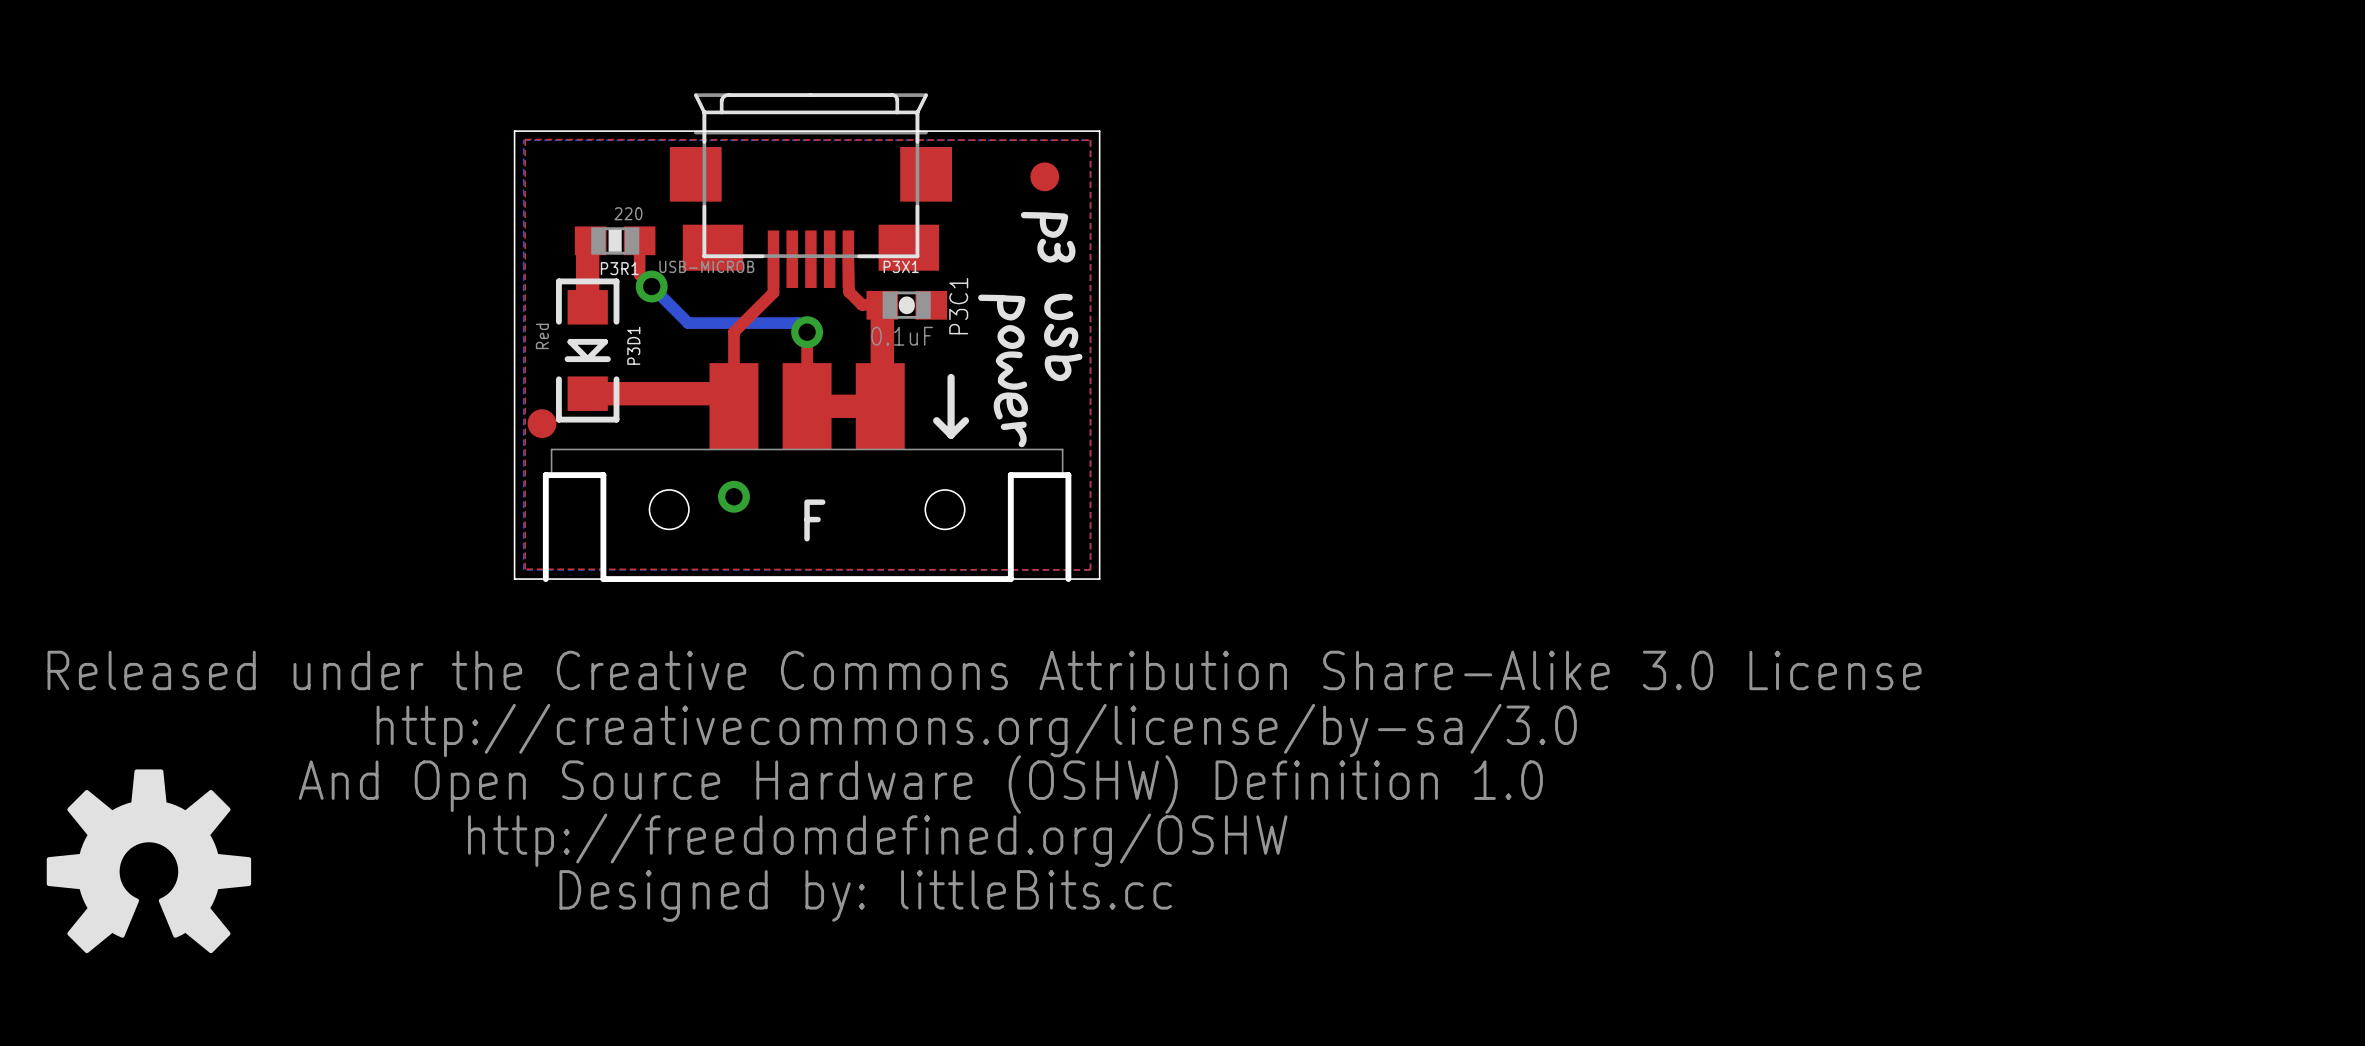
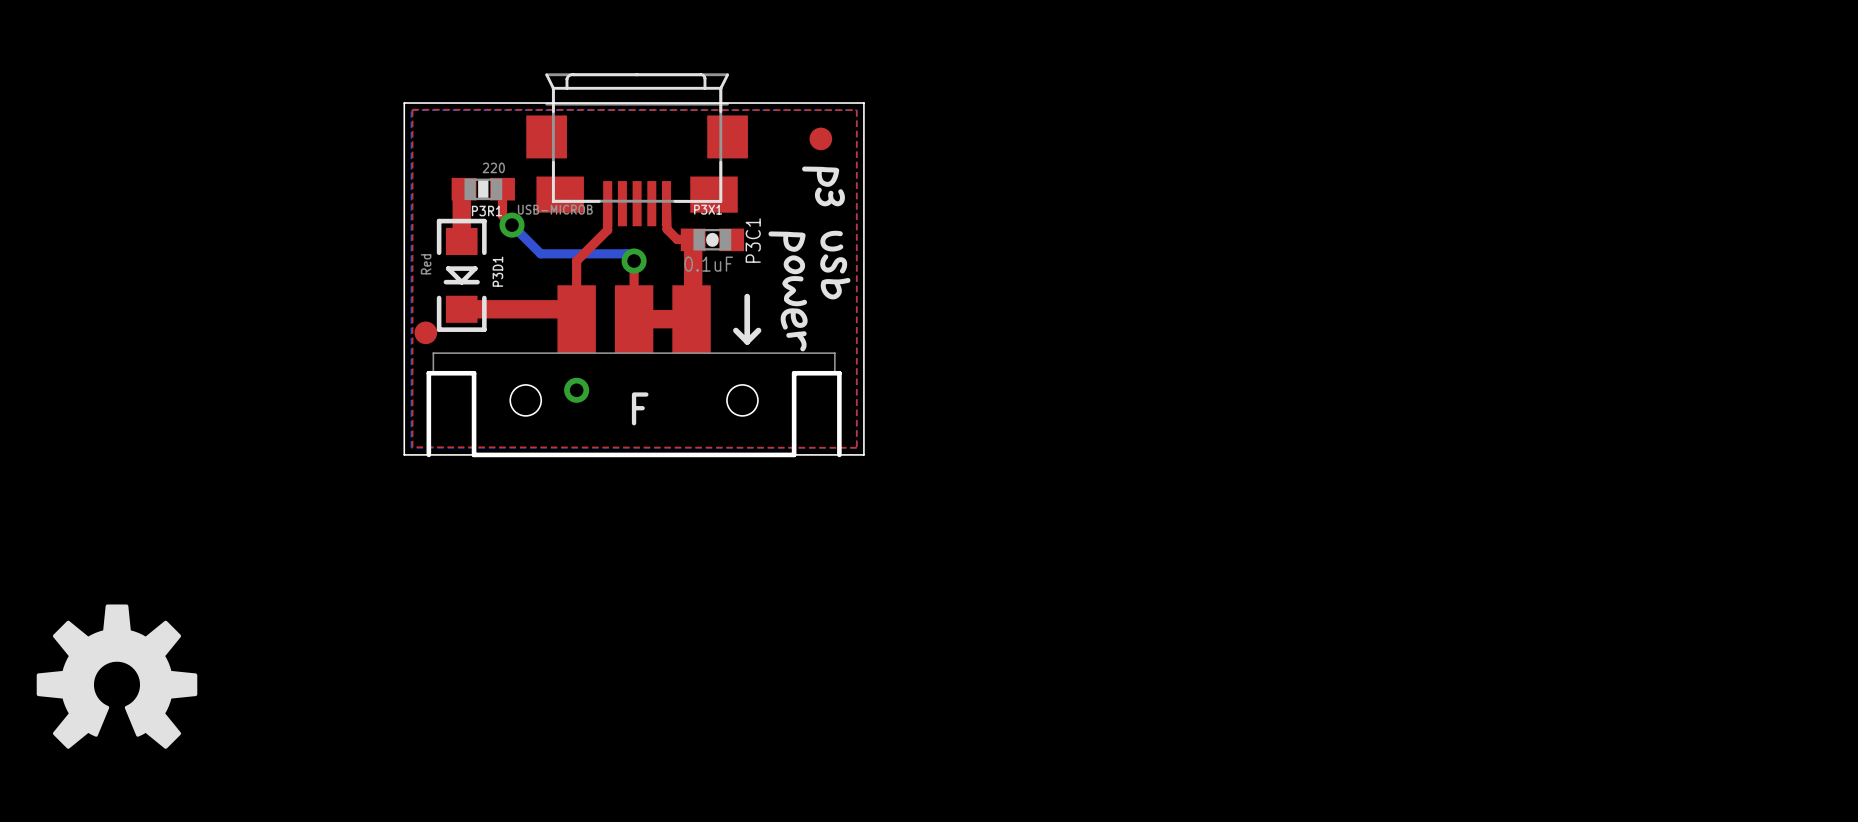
drawing: [47, 650, 1922, 922] -> none

